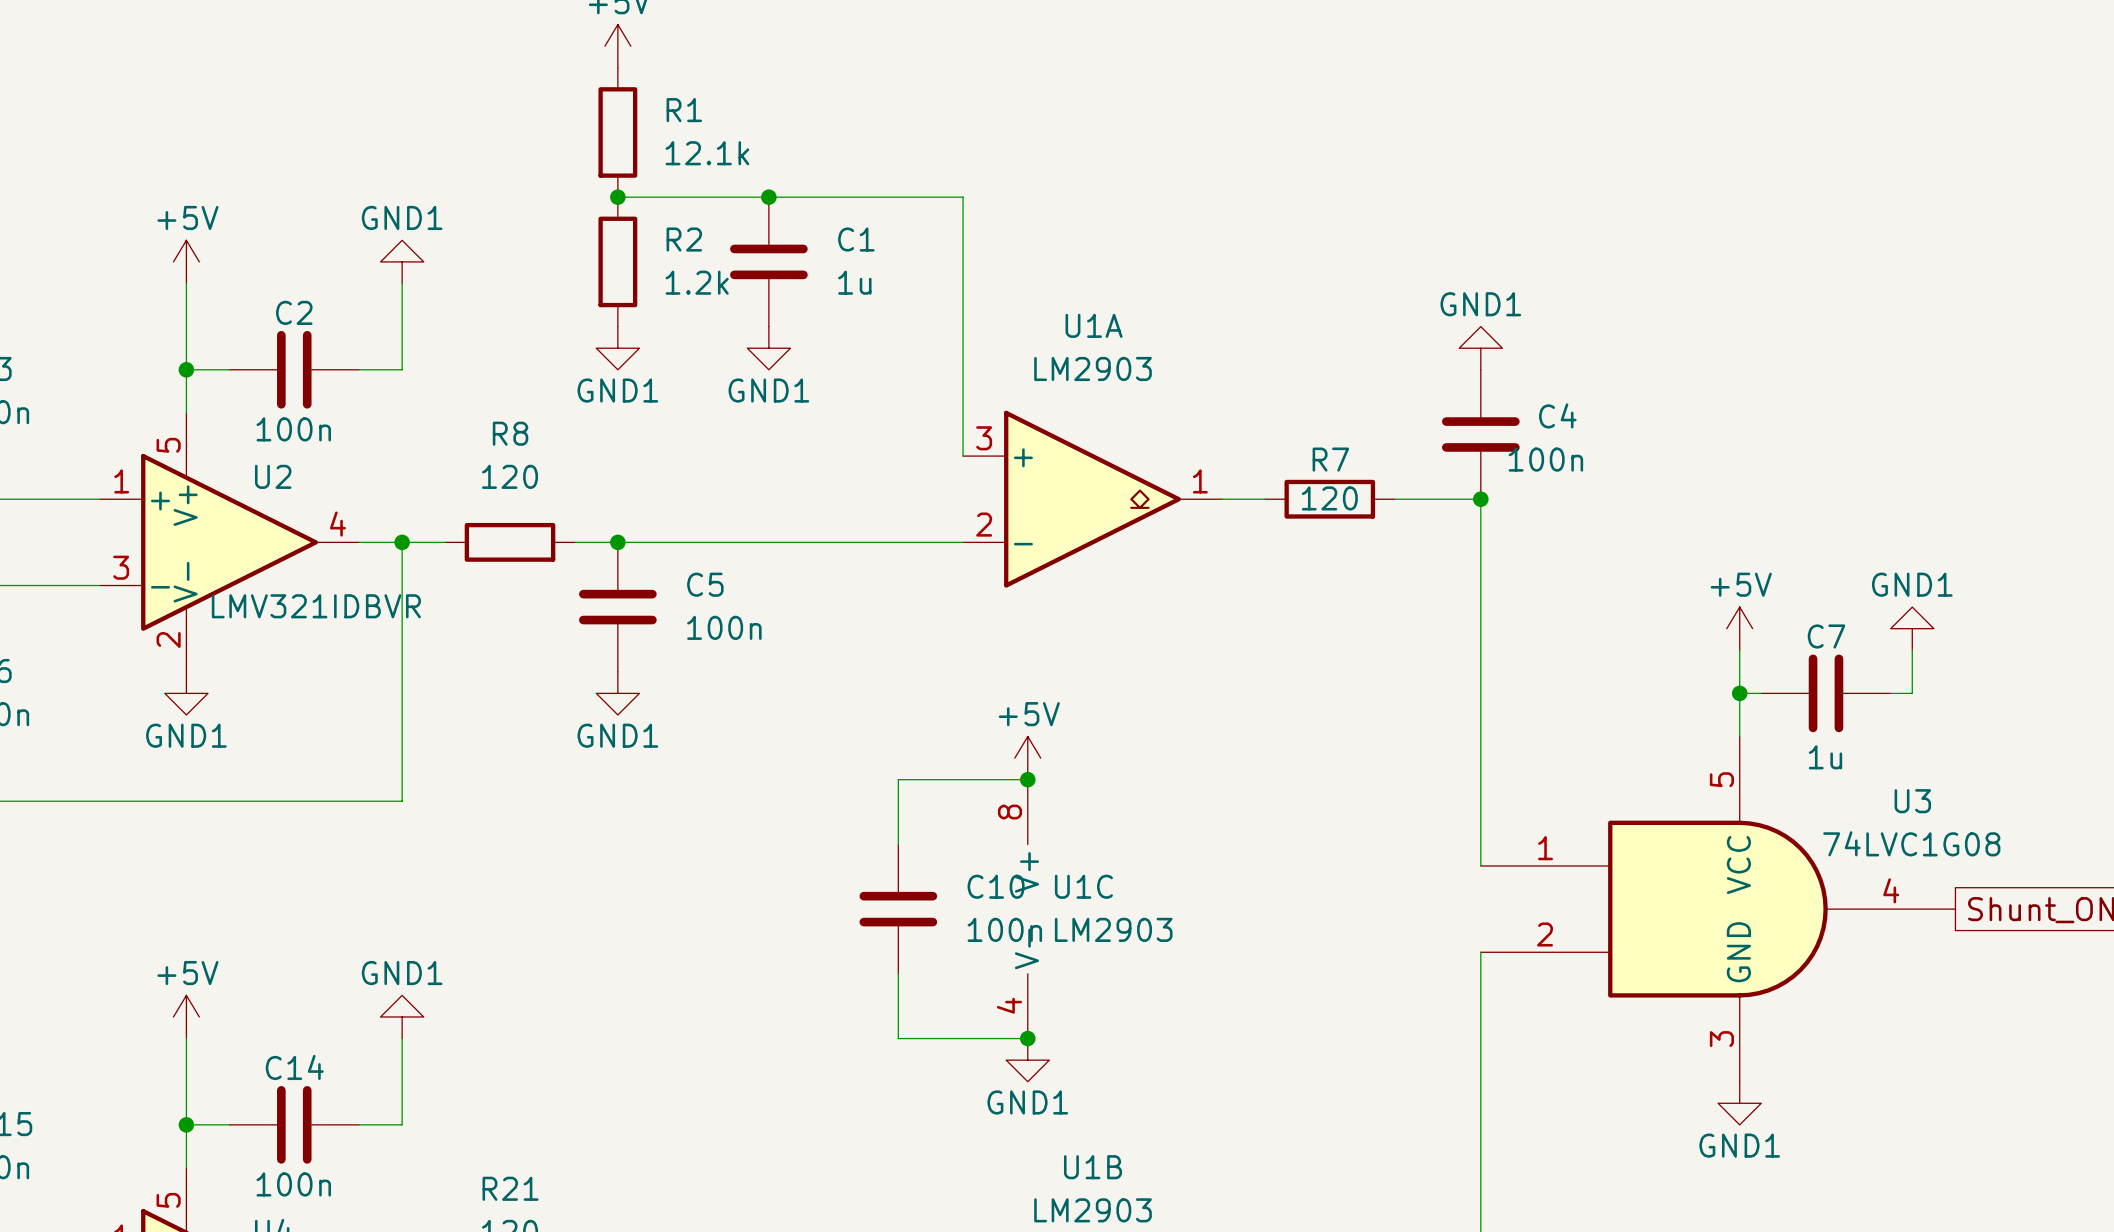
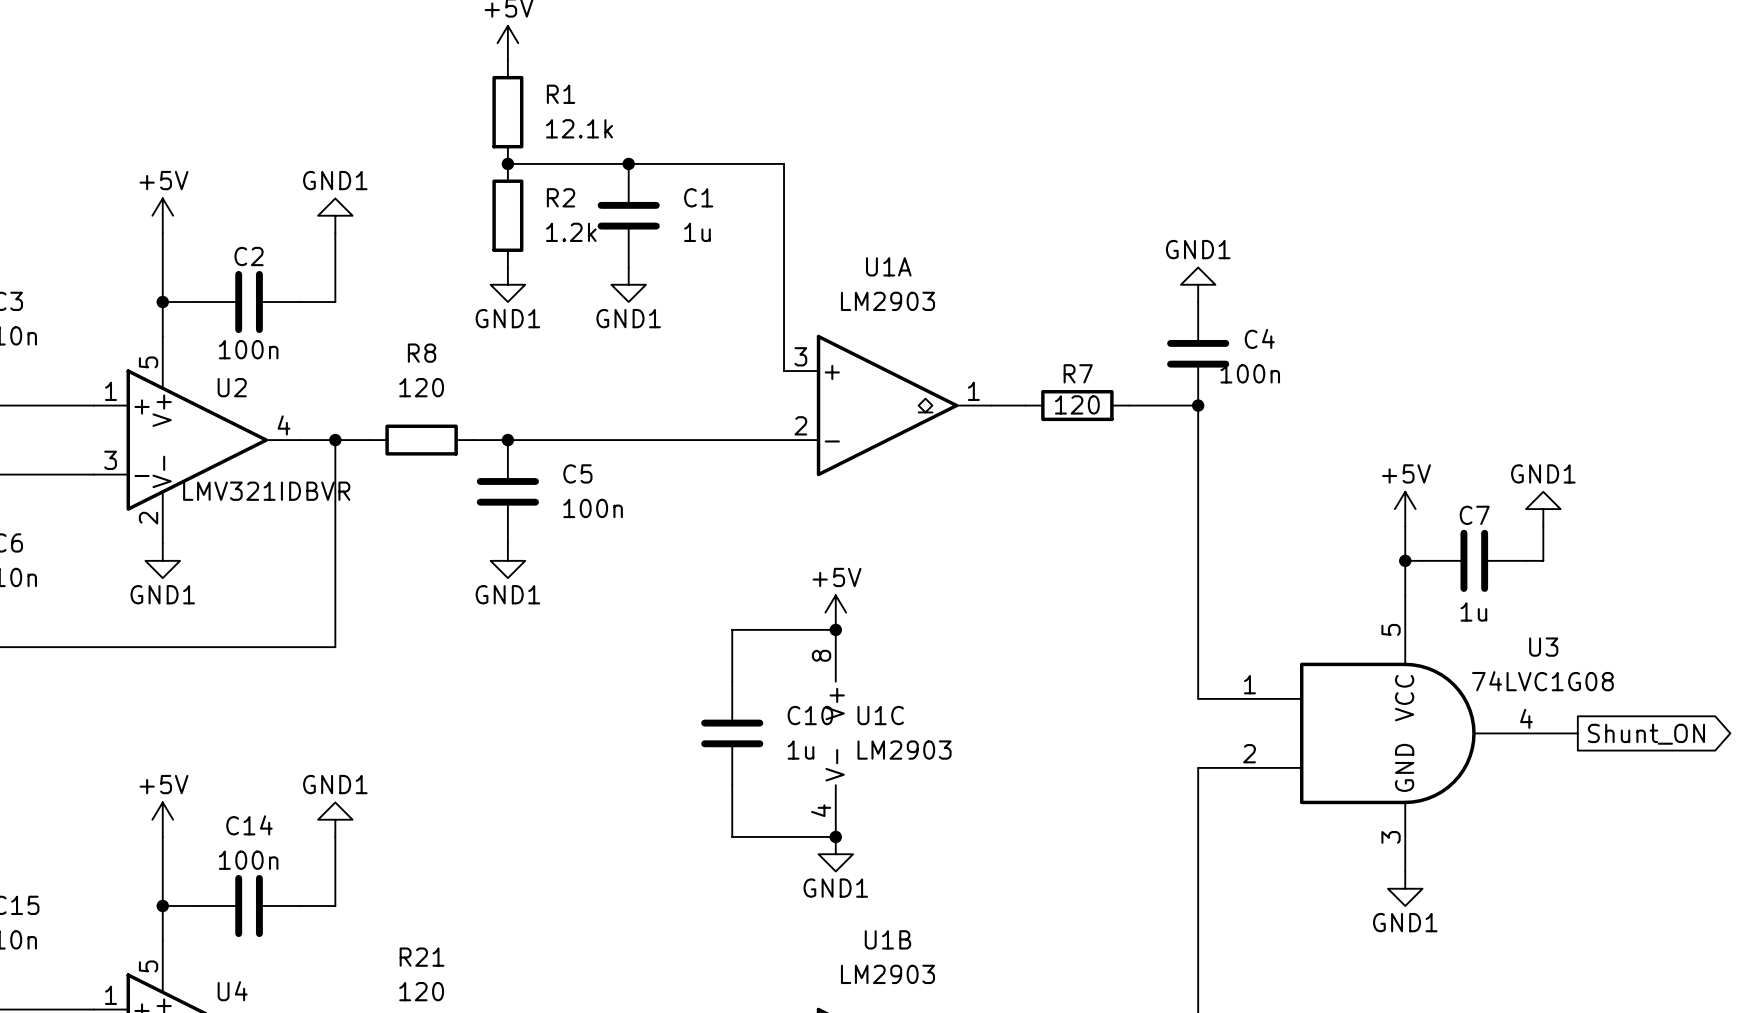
C10 value: 100n (1004, 929) -> 1u (800, 750)
C14 name position: C14 (294, 1067) -> C14 (249, 825)
C14 value position: 100n (293, 1184) -> 100n (248, 860)

